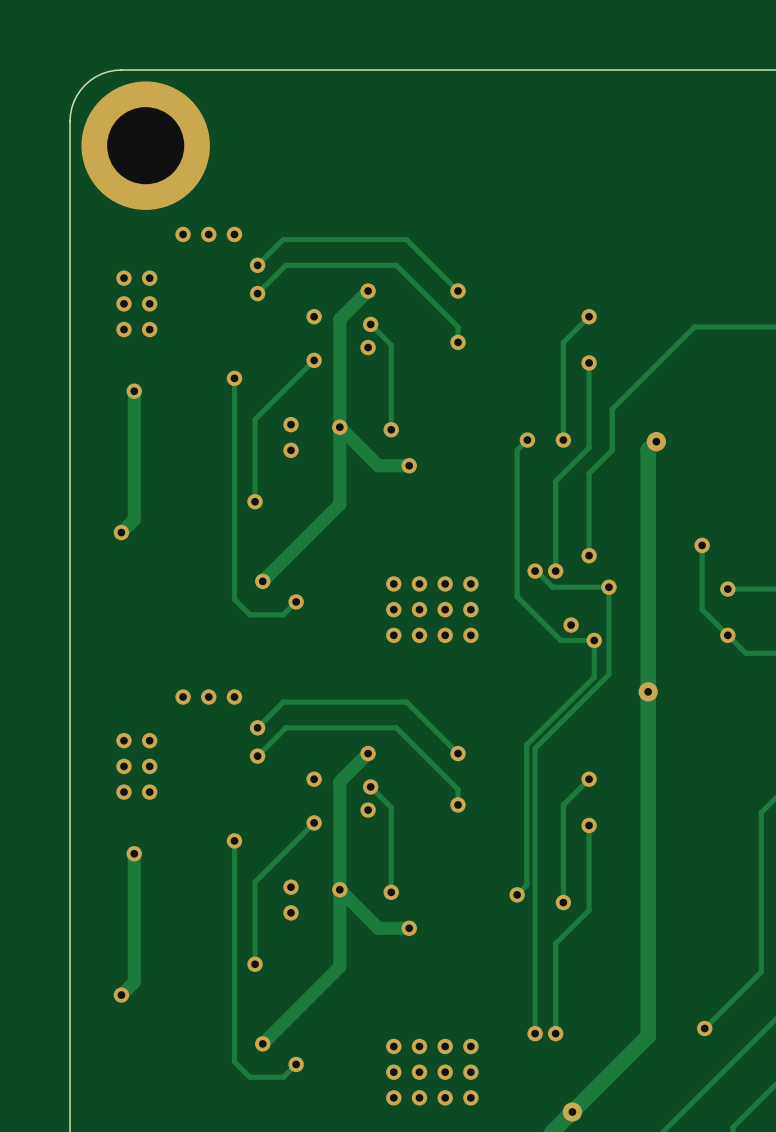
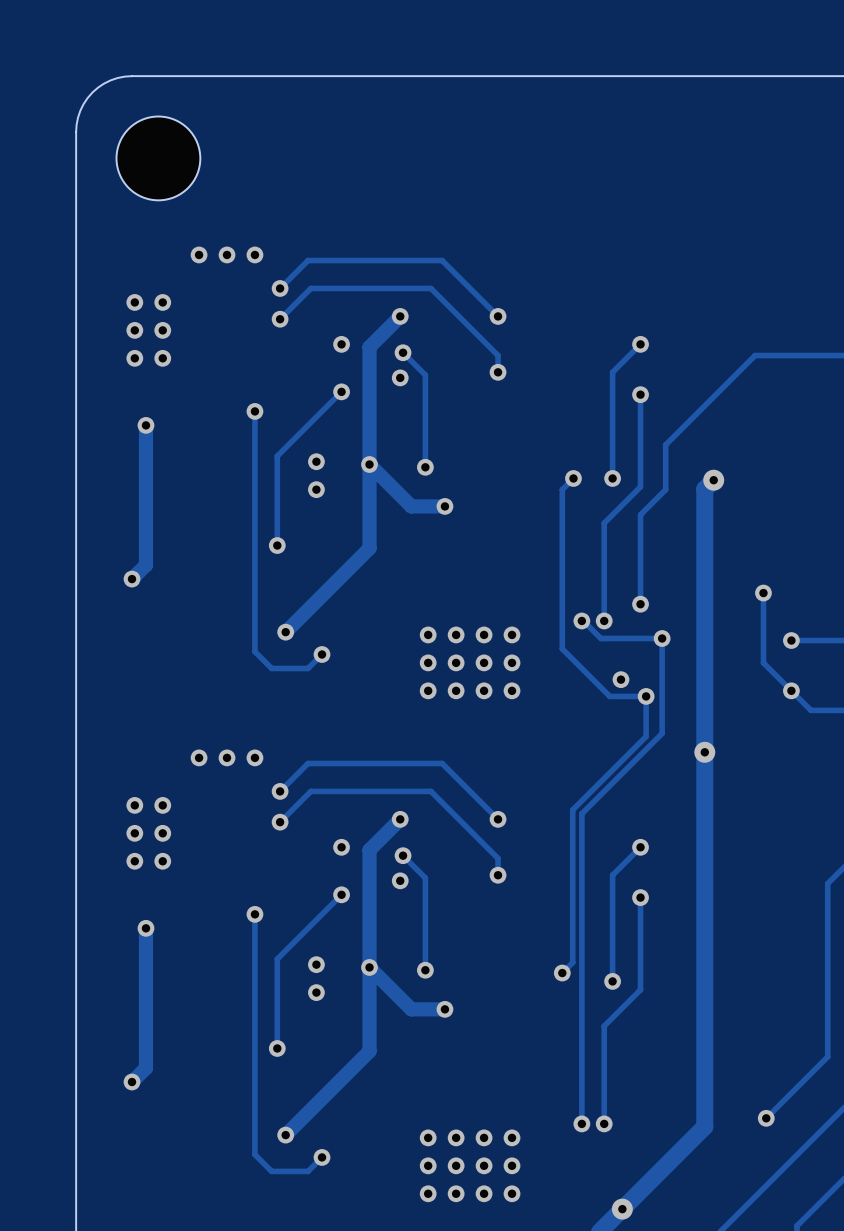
via: (145, 145) -> none
hole: none -> (158, 158)

